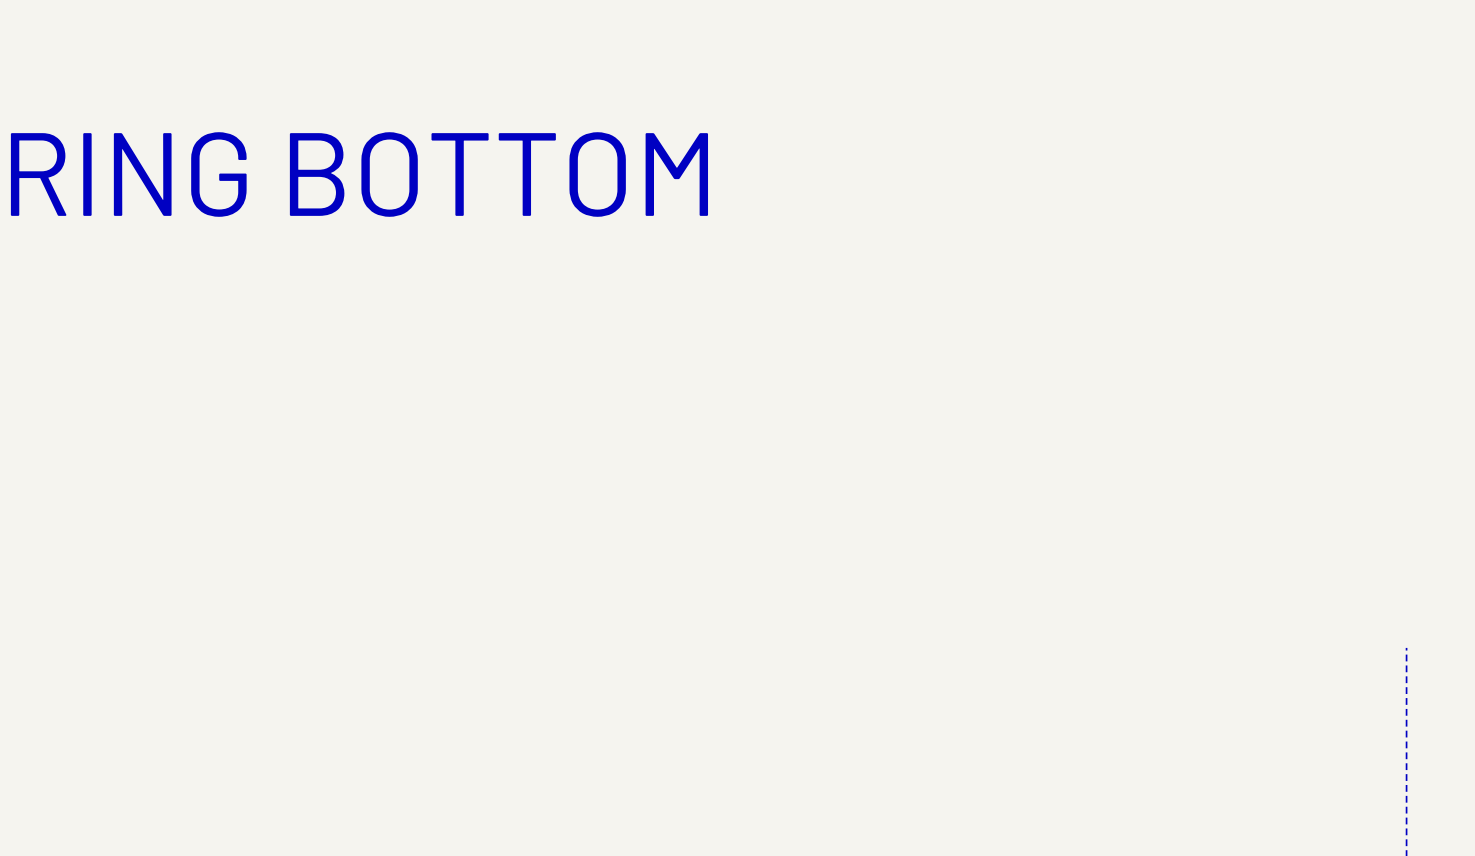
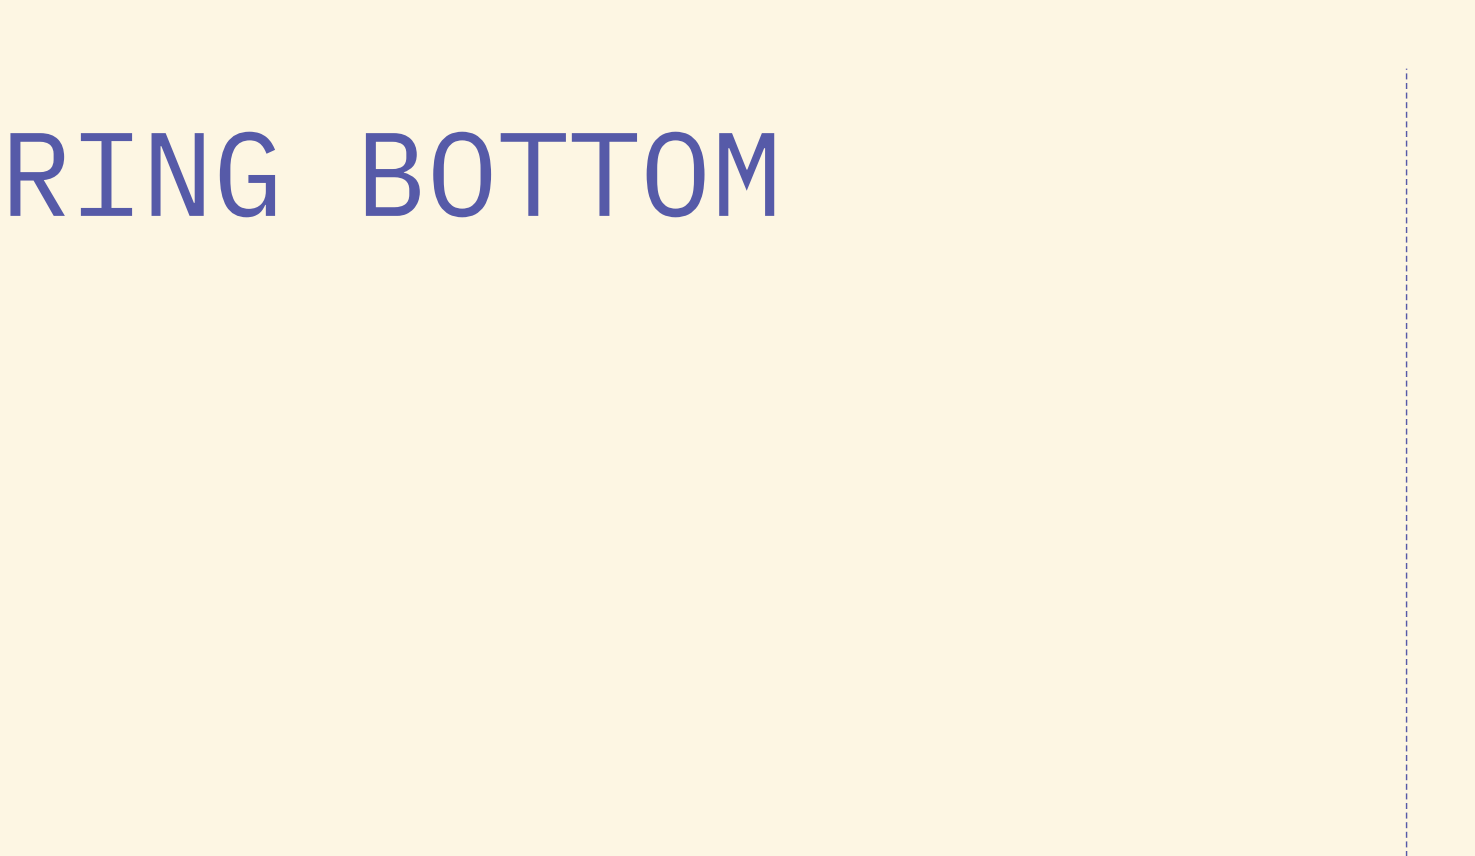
line: none -> (1406, 68) (1406, 647)

